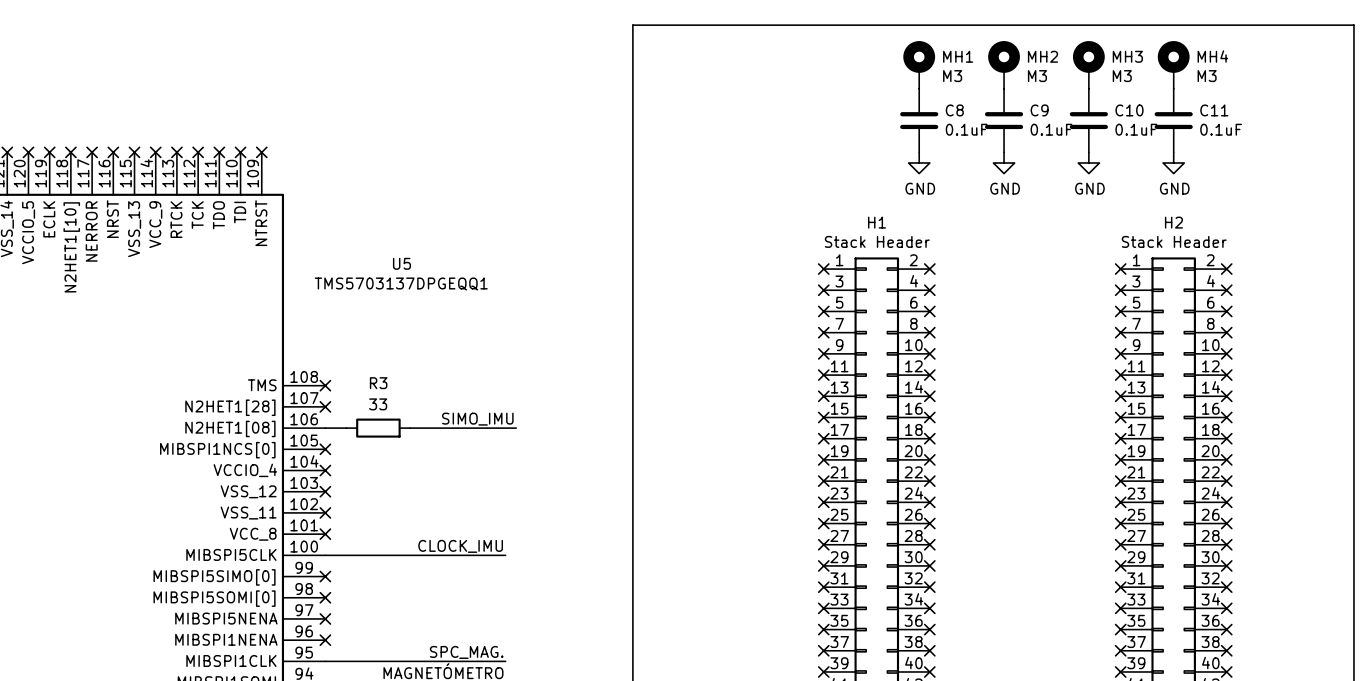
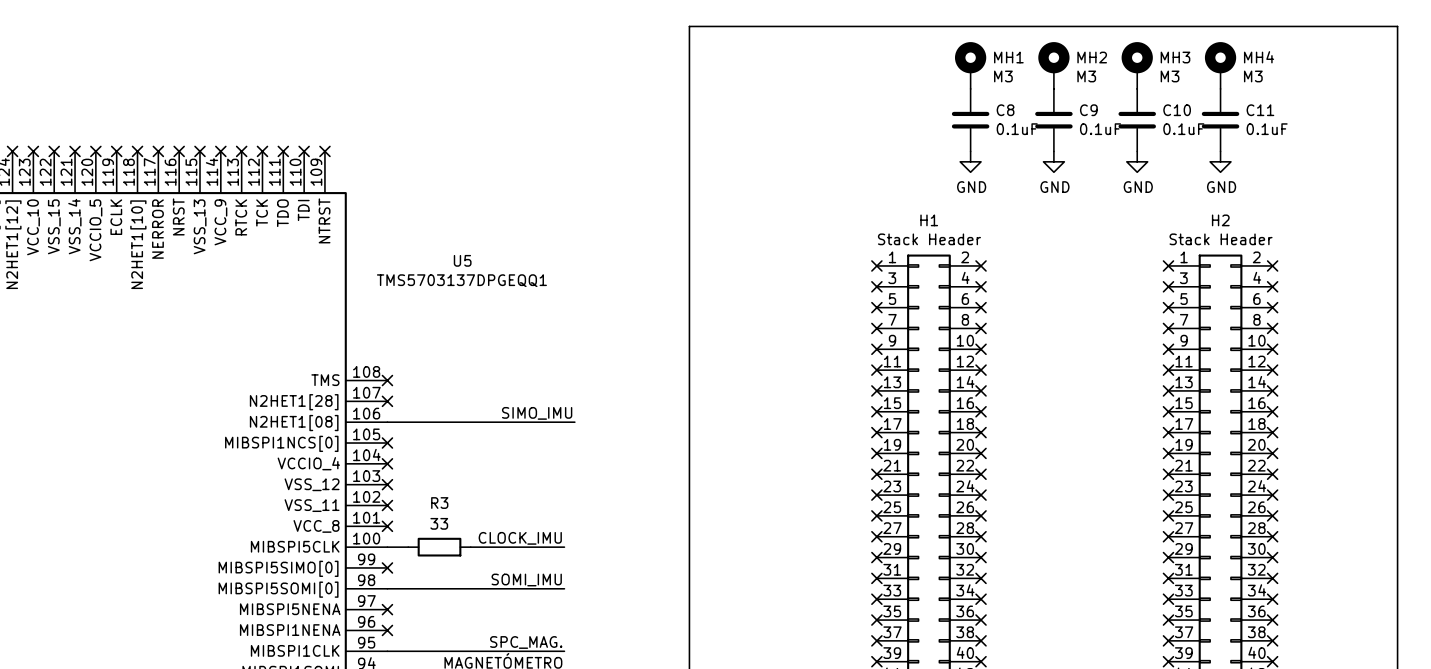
R3 position: (378, 428) -> (439, 547)
wire: (346, 555) (410, 555) -> (408, 422) (470, 422)
label: none -> SOMI_IMU (526, 580)
wire: none -> (387, 588) (564, 588)
no-connect mark: (325, 597) -> none

